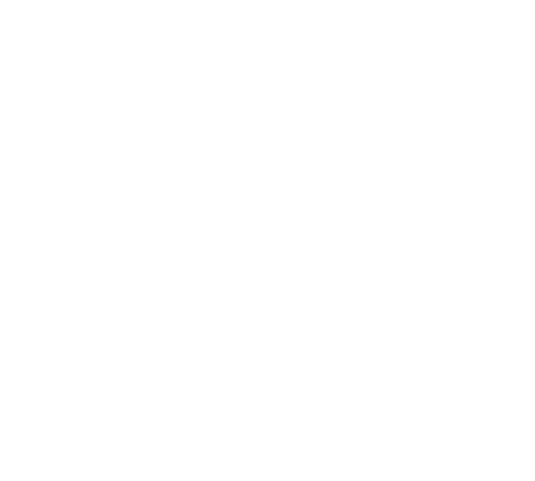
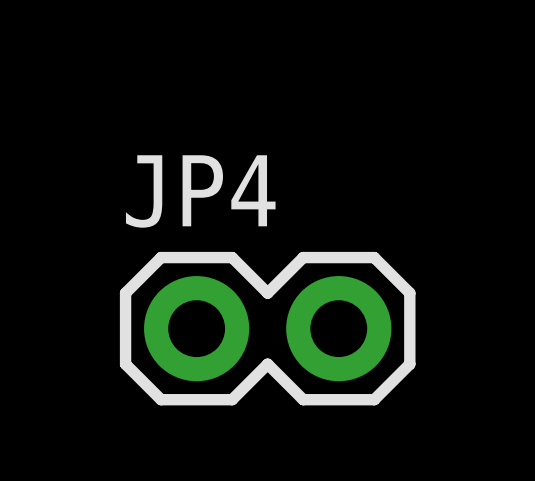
JP4: none -> (267, 328)

